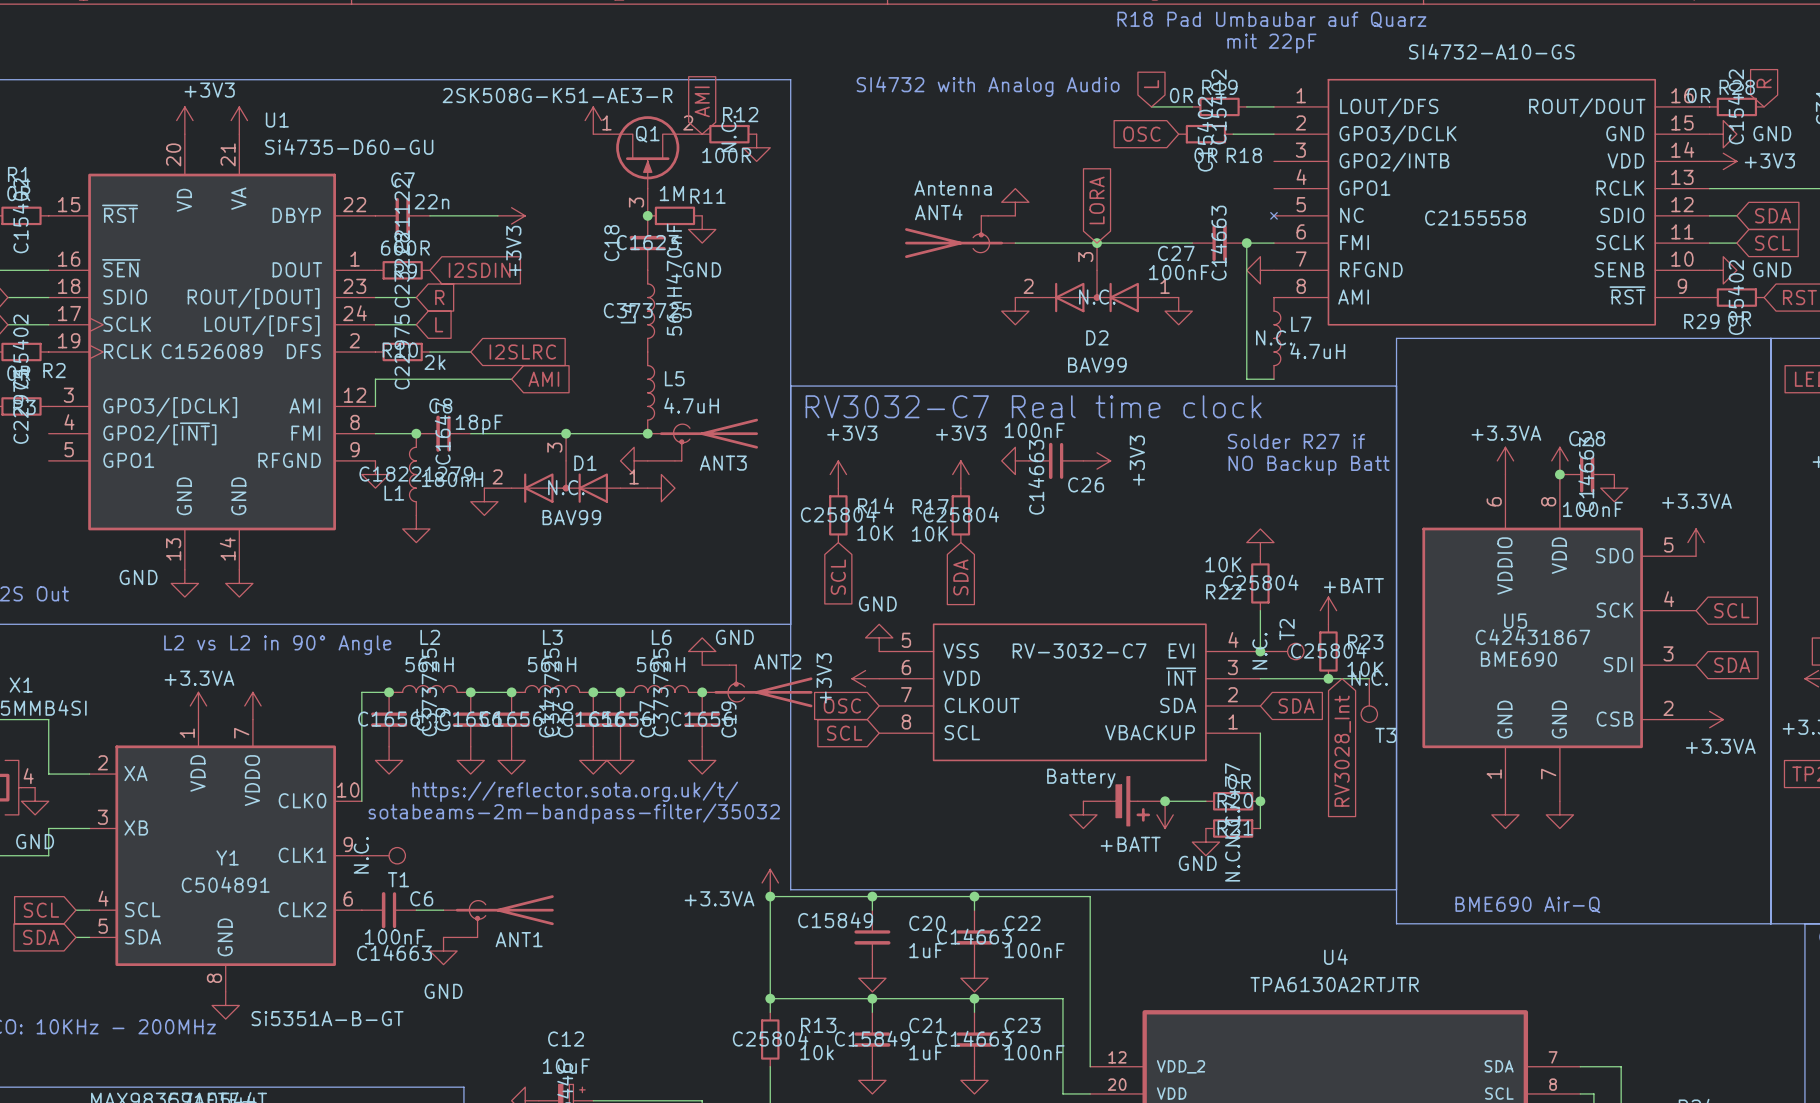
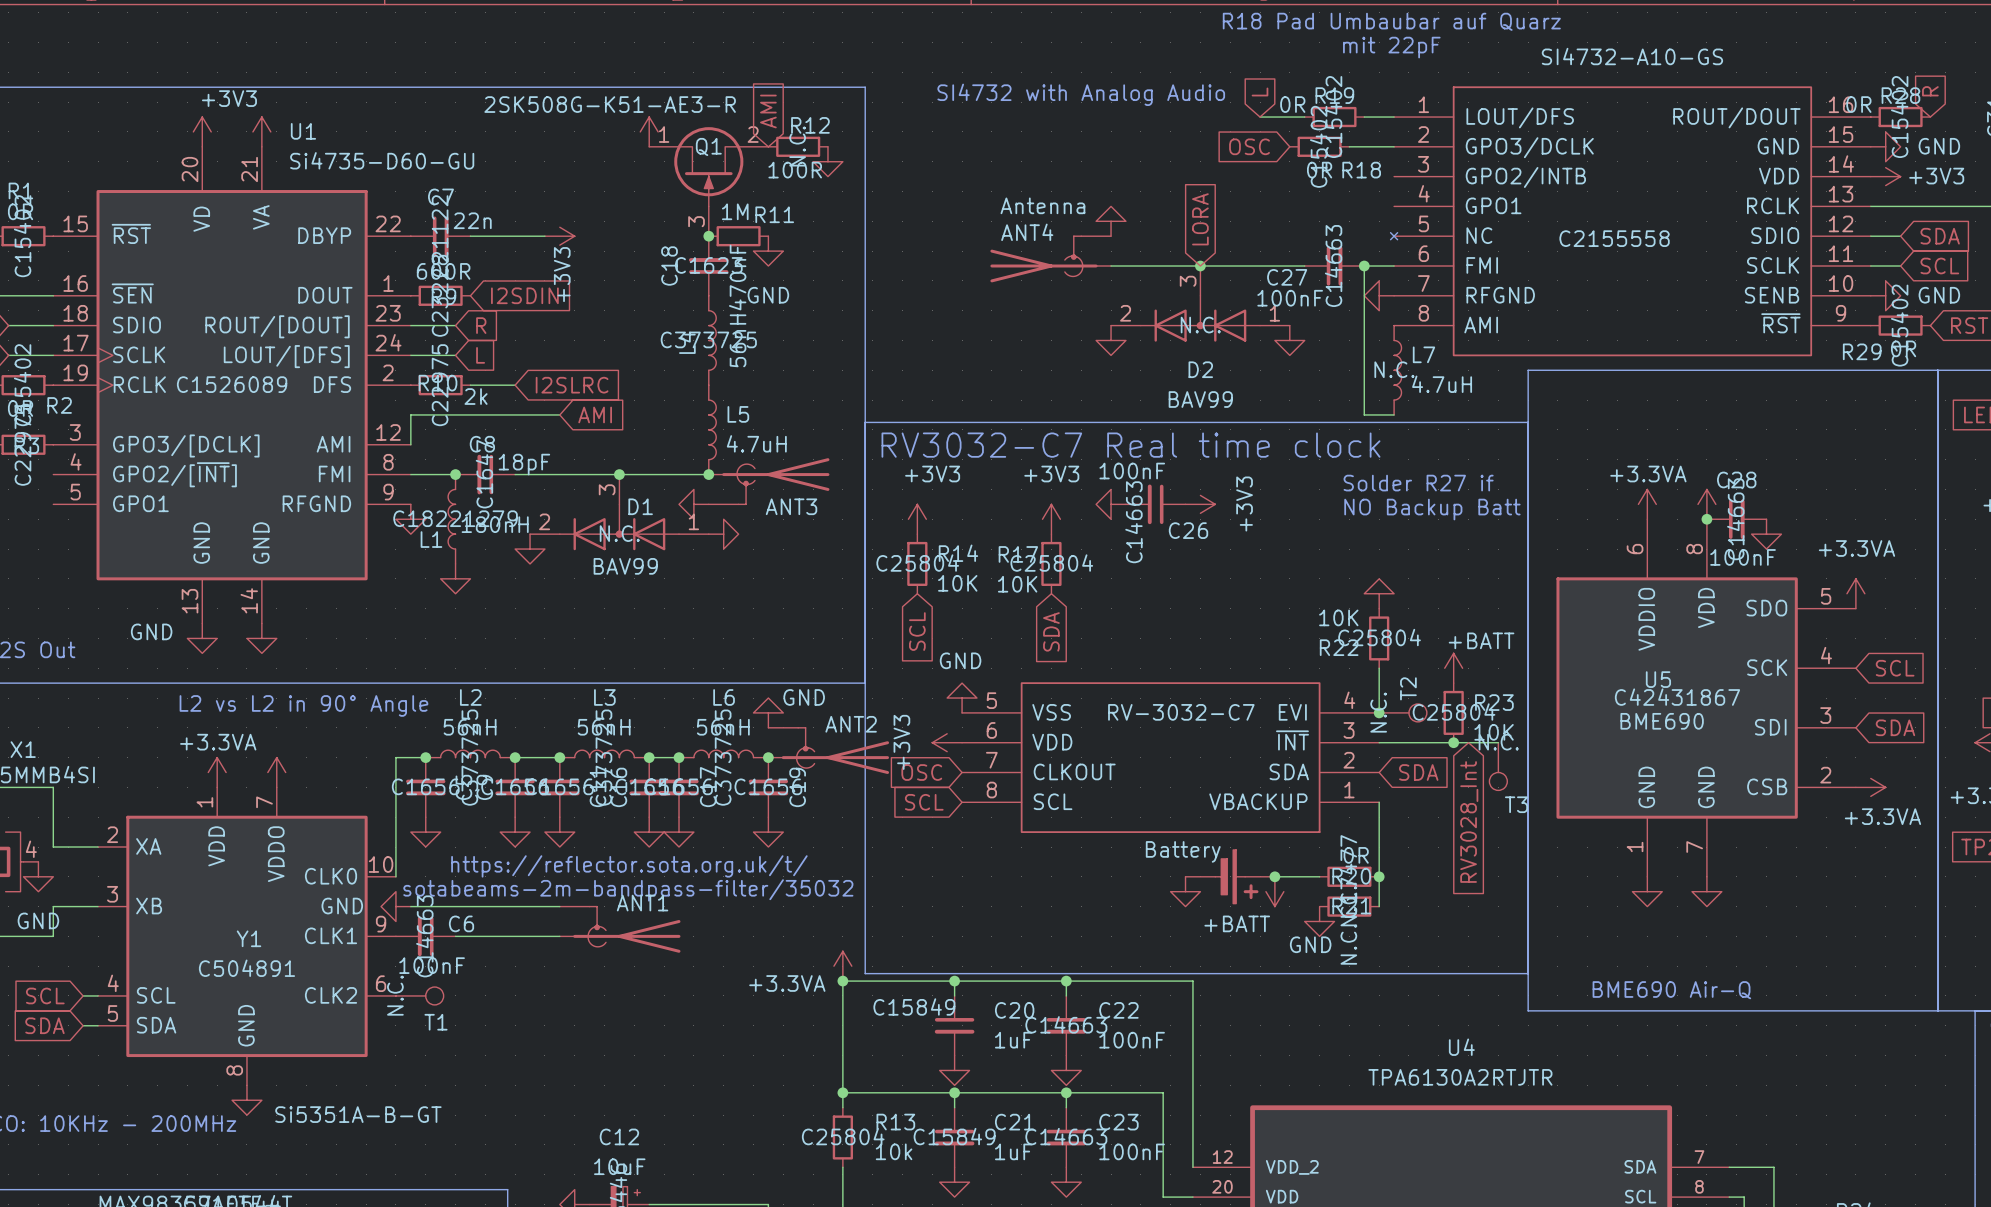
wire: none -> (410, 906) (559, 906)
T1 position: (383, 855) -> (419, 995)
wire: none -> (455, 936) (559, 936)
C6 position: (389, 910) -> (425, 936)
wire: (416, 910) (443, 910) -> none
ANT1 position: (498, 916) -> (620, 929)
ANT1 flip: as is (504, 916) -> up-down (626, 929)
power symbol rotation: 0° (443, 951) -> 90° clockwise (395, 906)
power symbol position: GND (443, 951) -> GND (395, 906)
C6 text rotation: 0° (394, 952) -> 90° counterclockwise (424, 936)

